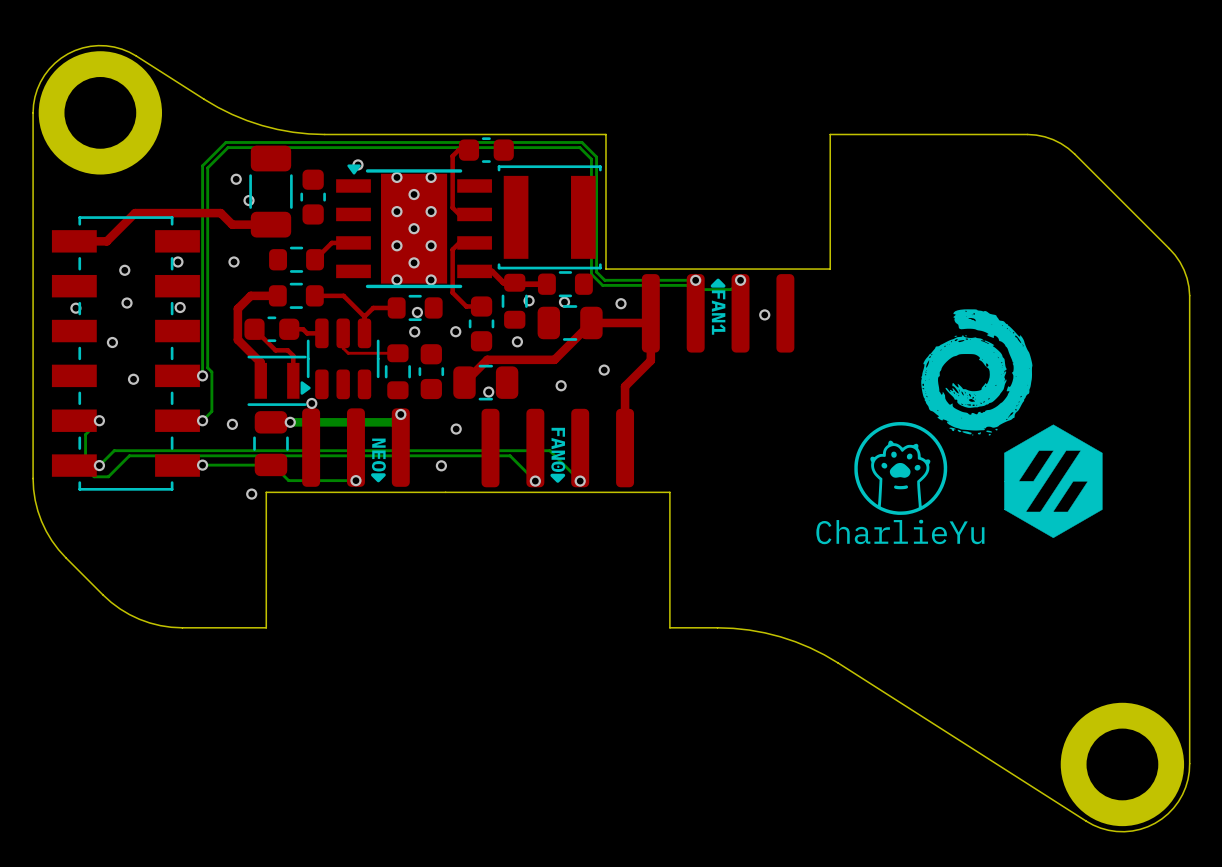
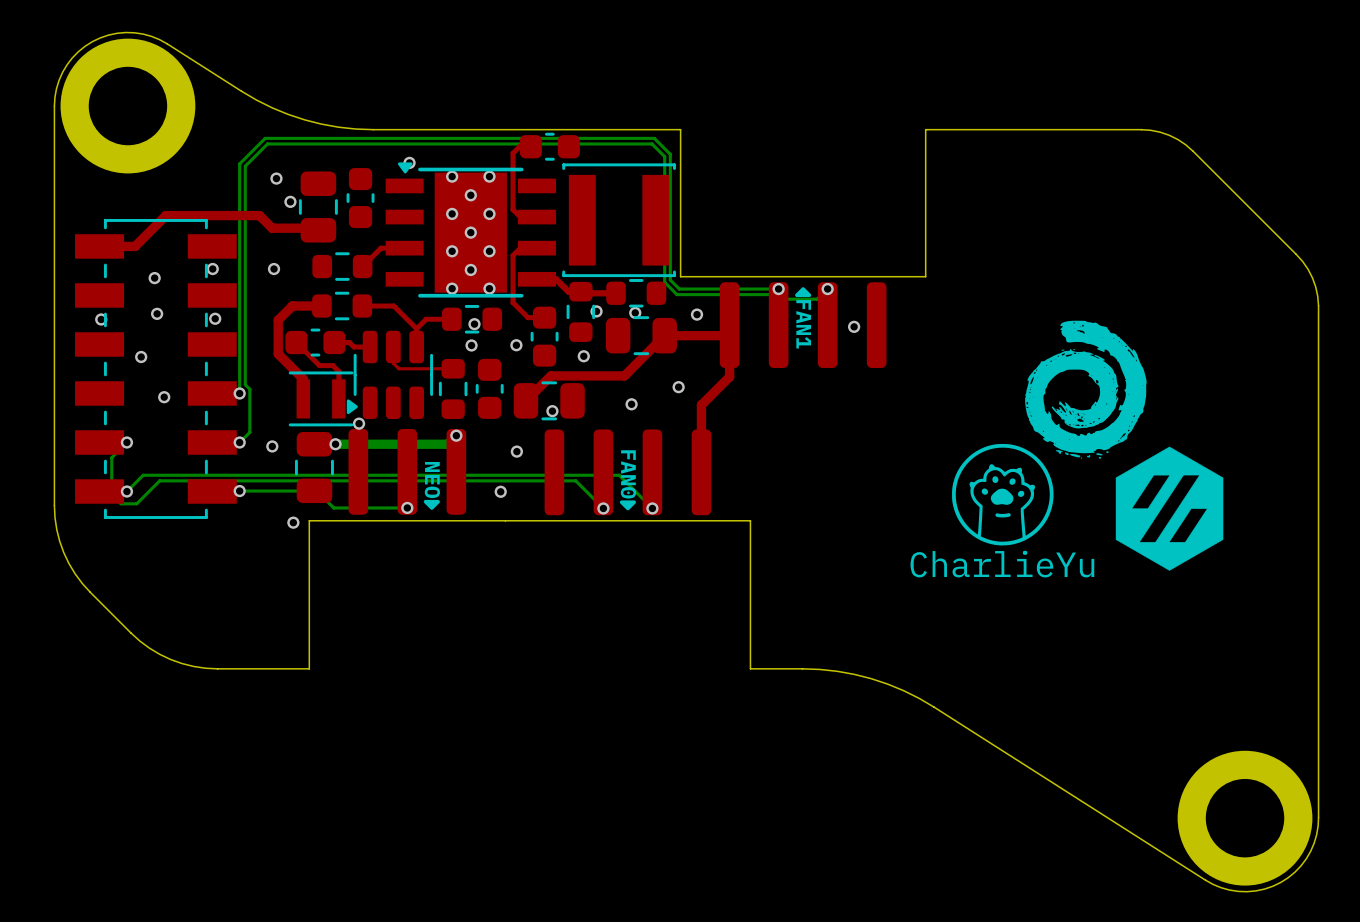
part footprint: [249, 145, 293, 238] -> [298, 171, 338, 243]

